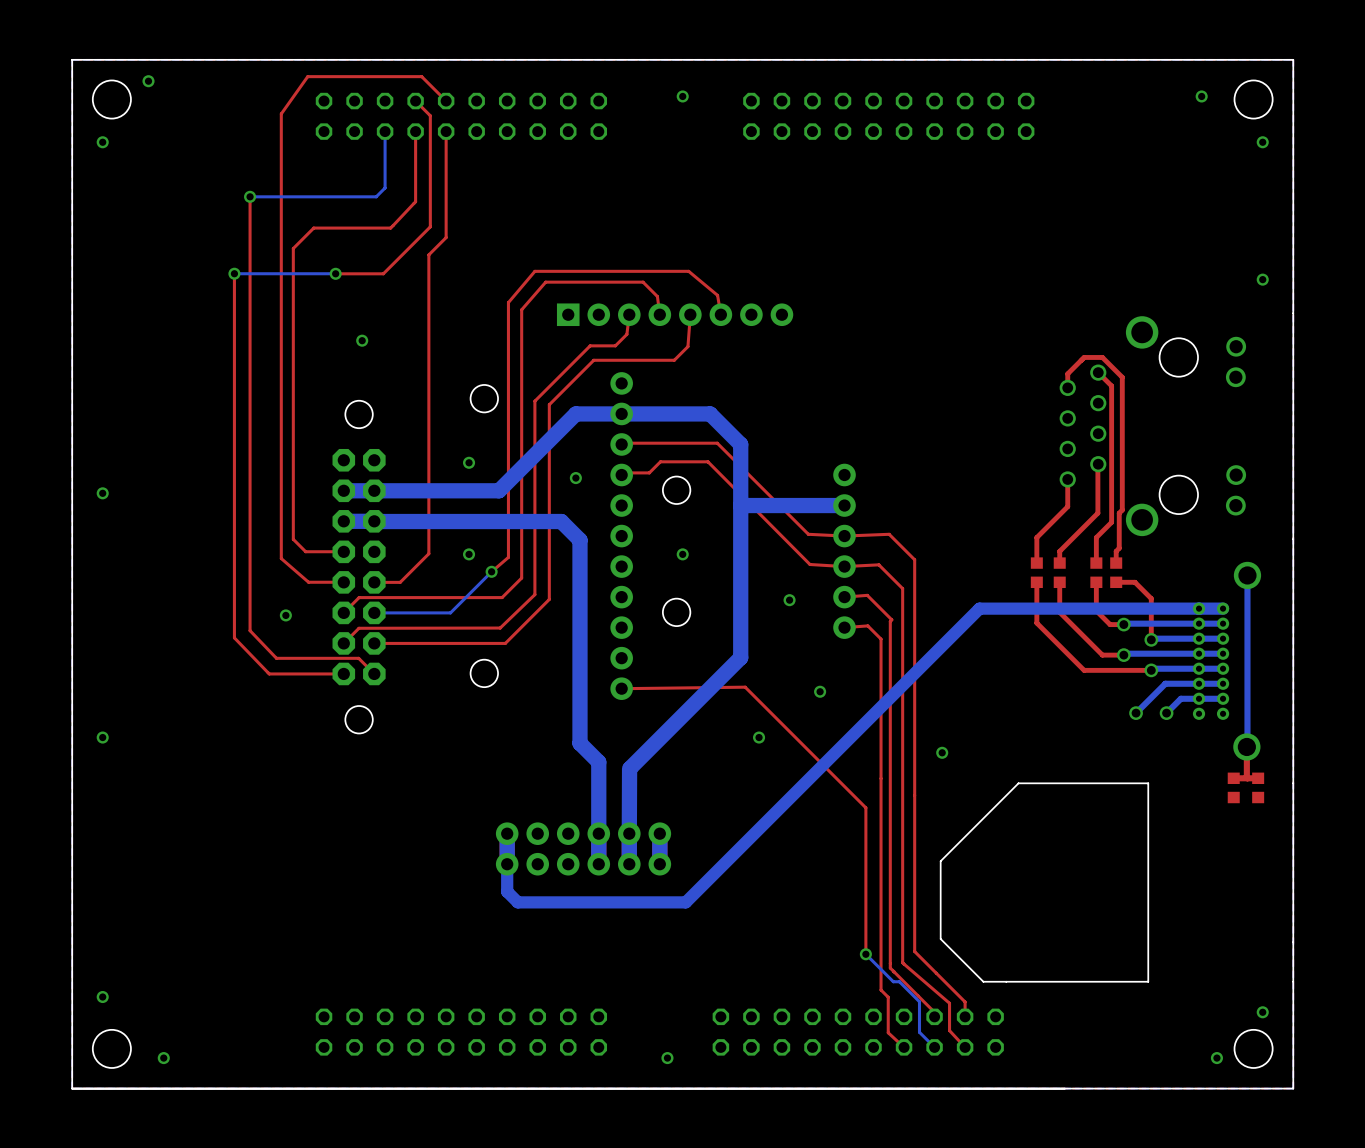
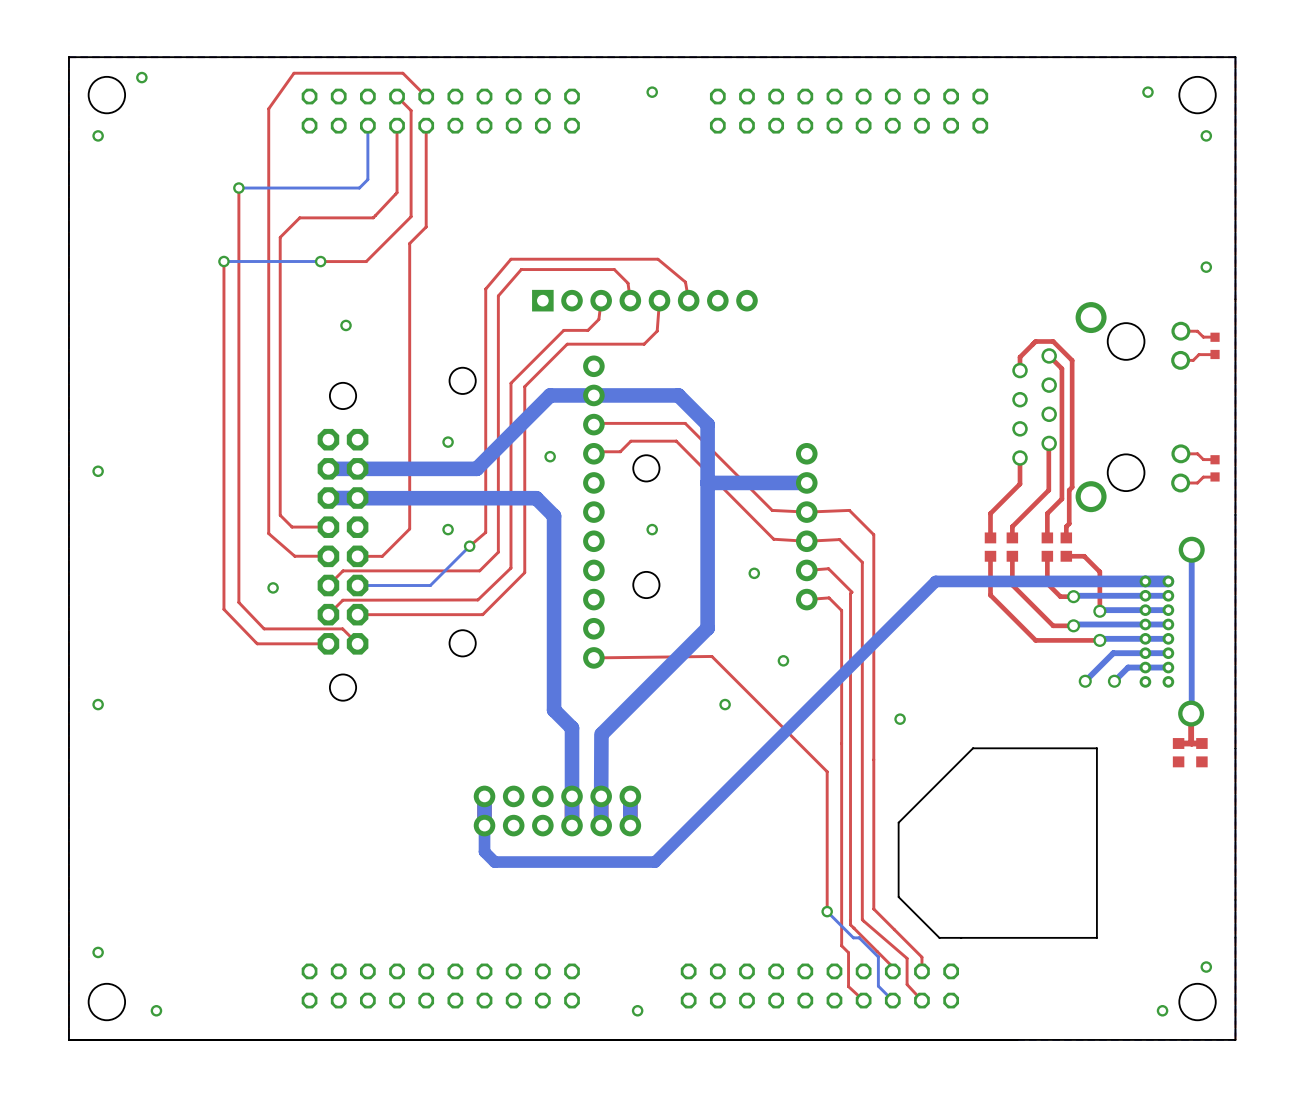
top track: none -> (1180, 331) (1197, 331) (1203, 337) (1214, 337)
part: none -> (1215, 345)
top track: none -> (1214, 354) (1199, 354) (1193, 360) (1180, 360)
top track: none -> (1180, 453) (1197, 453) (1203, 459) (1214, 459)
part: none -> (1215, 468)
top track: none -> (1214, 477) (1203, 477) (1197, 483) (1180, 483)

